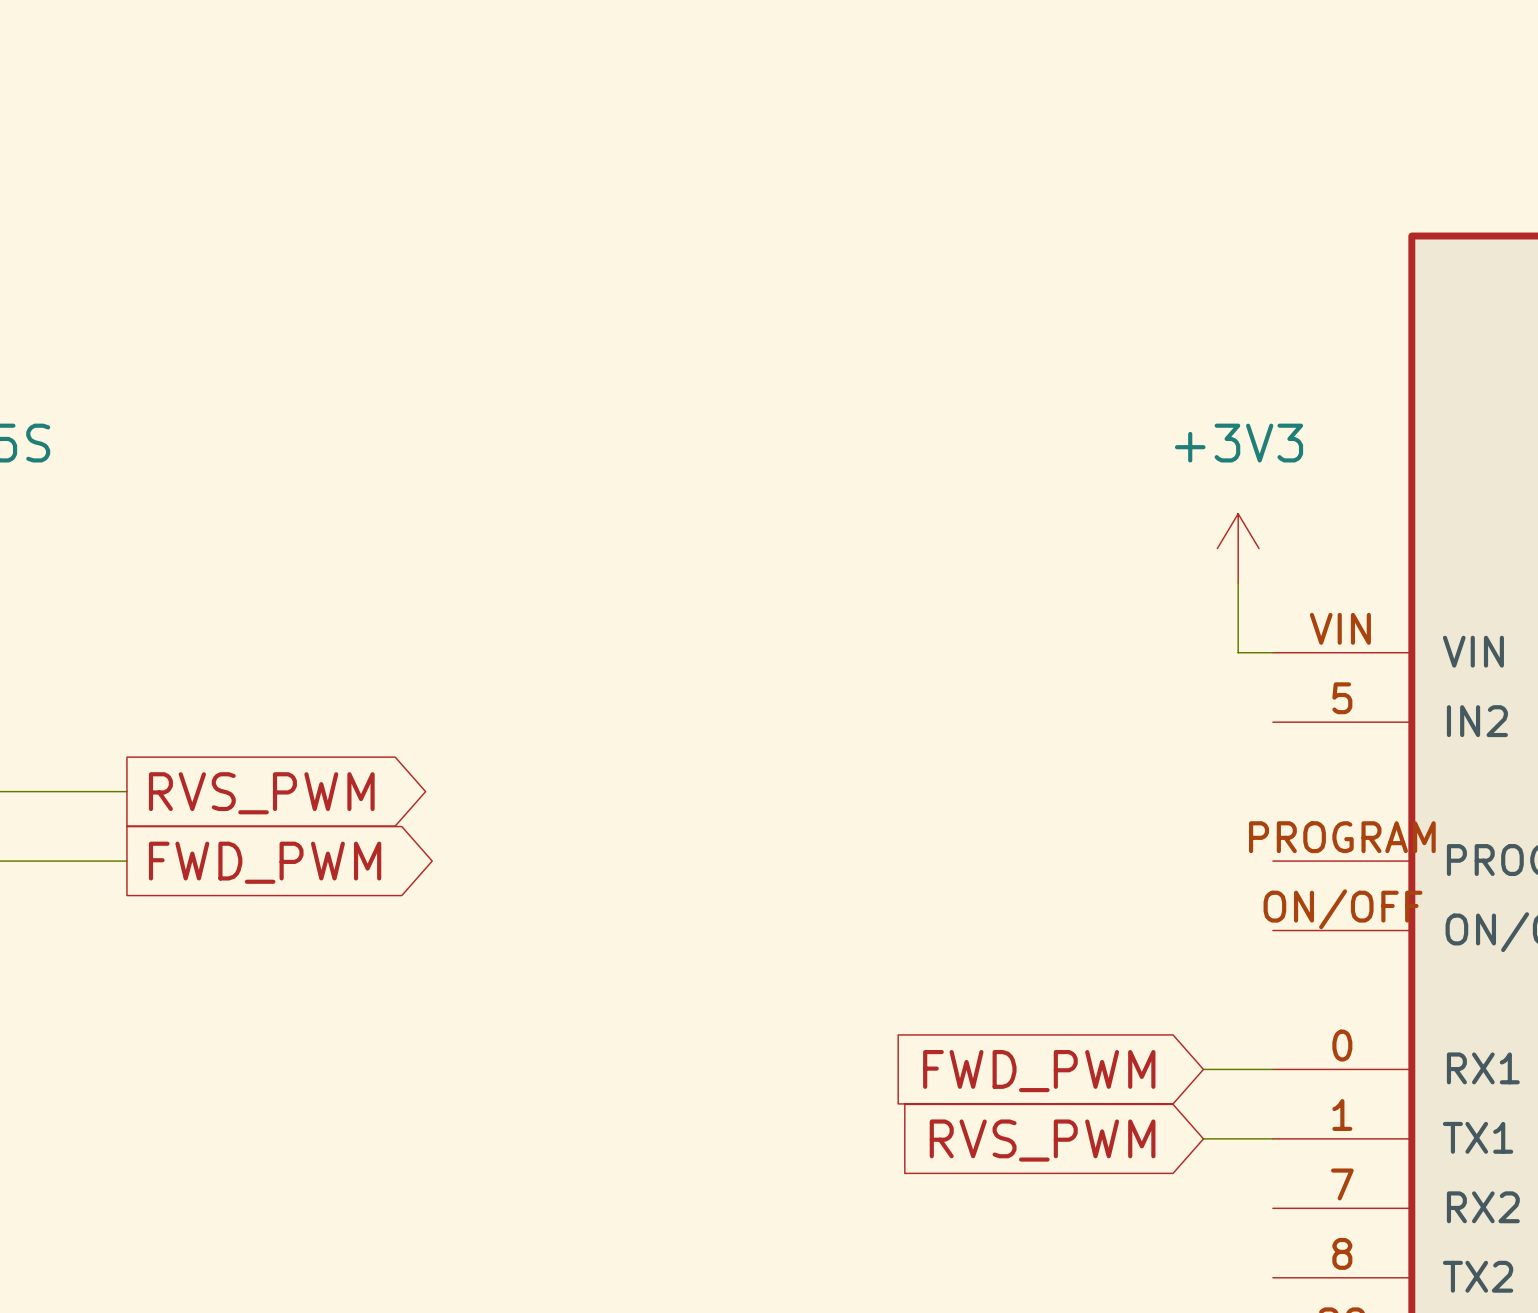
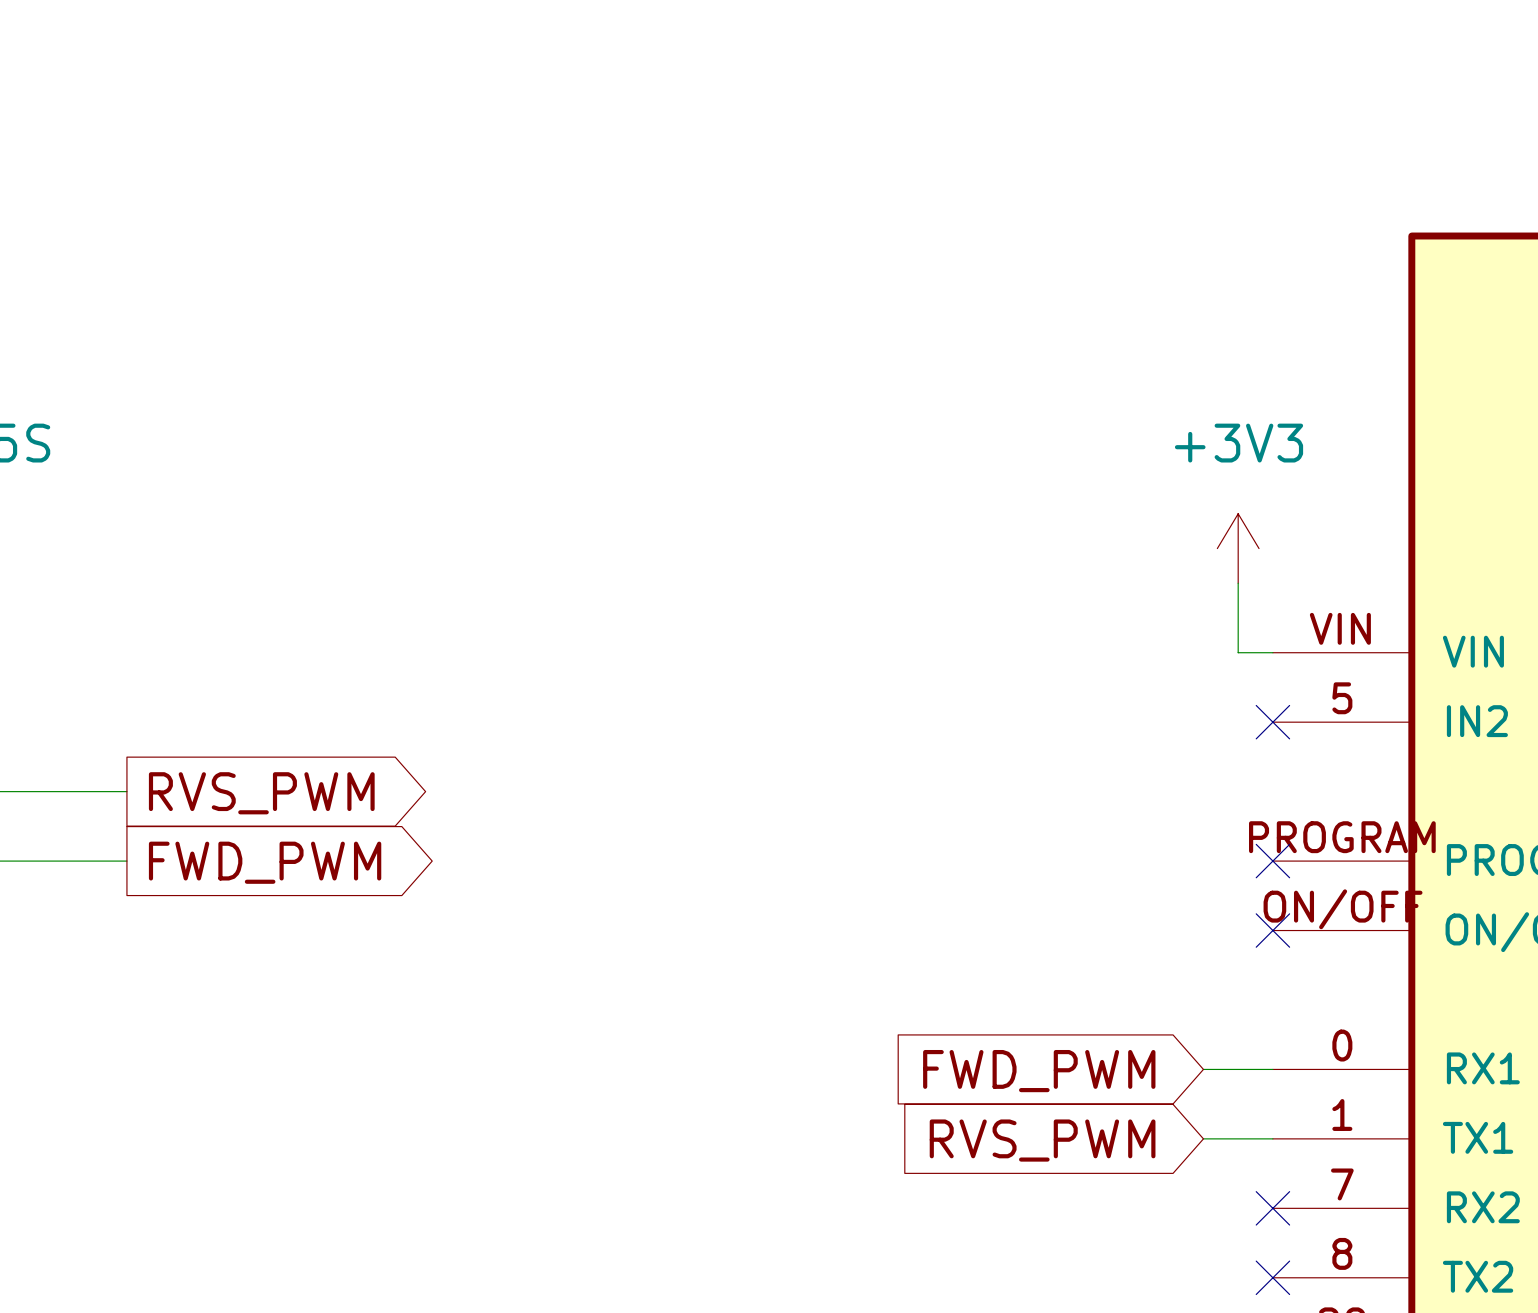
no-connect mark: none -> (1272, 722)
no-connect mark: none -> (1272, 861)
no-connect mark: none -> (1272, 930)
no-connect mark: none -> (1272, 1208)
no-connect mark: none -> (1272, 1277)

